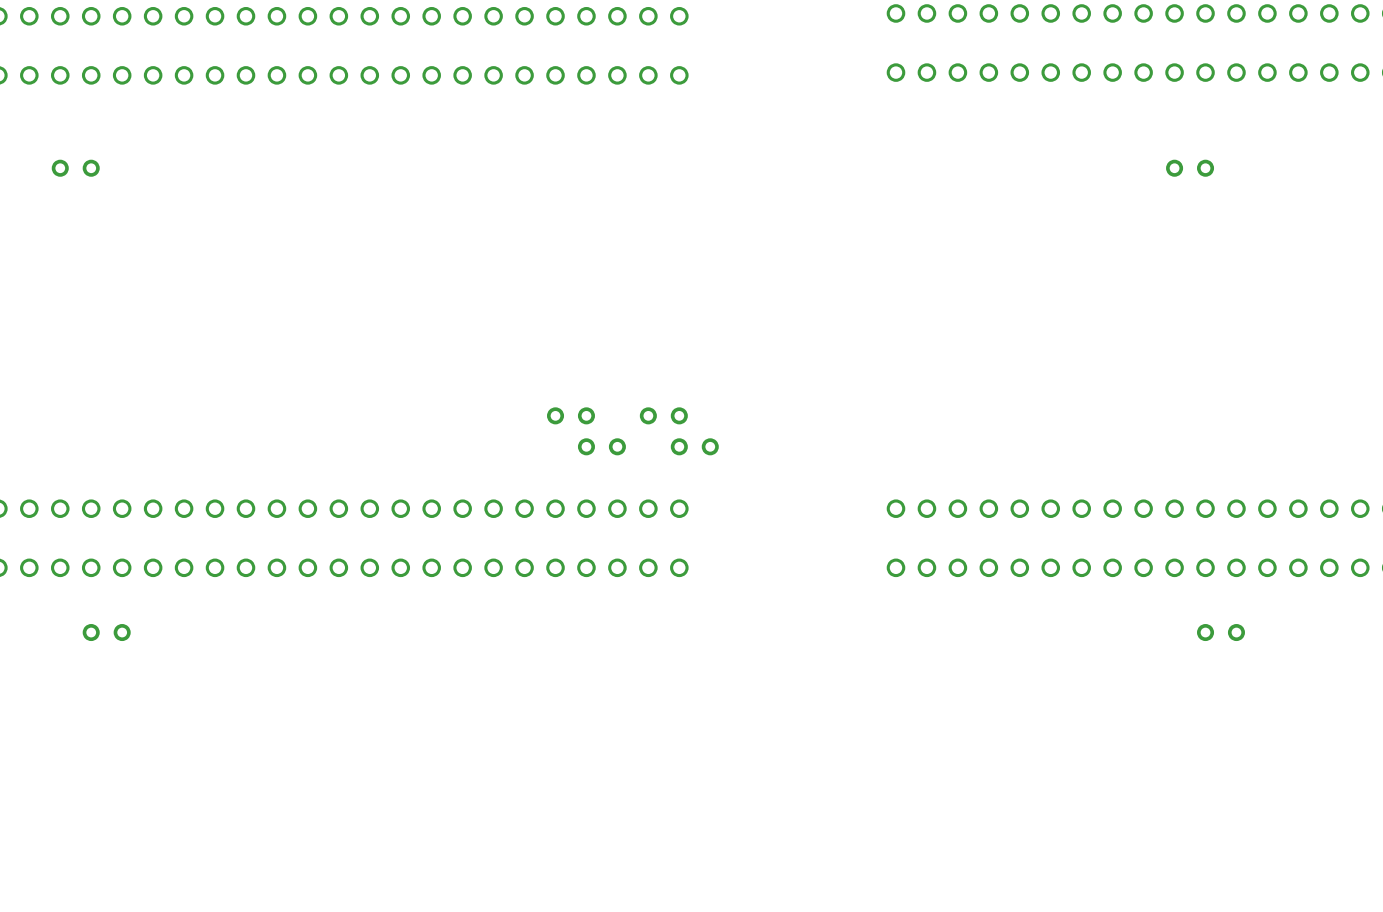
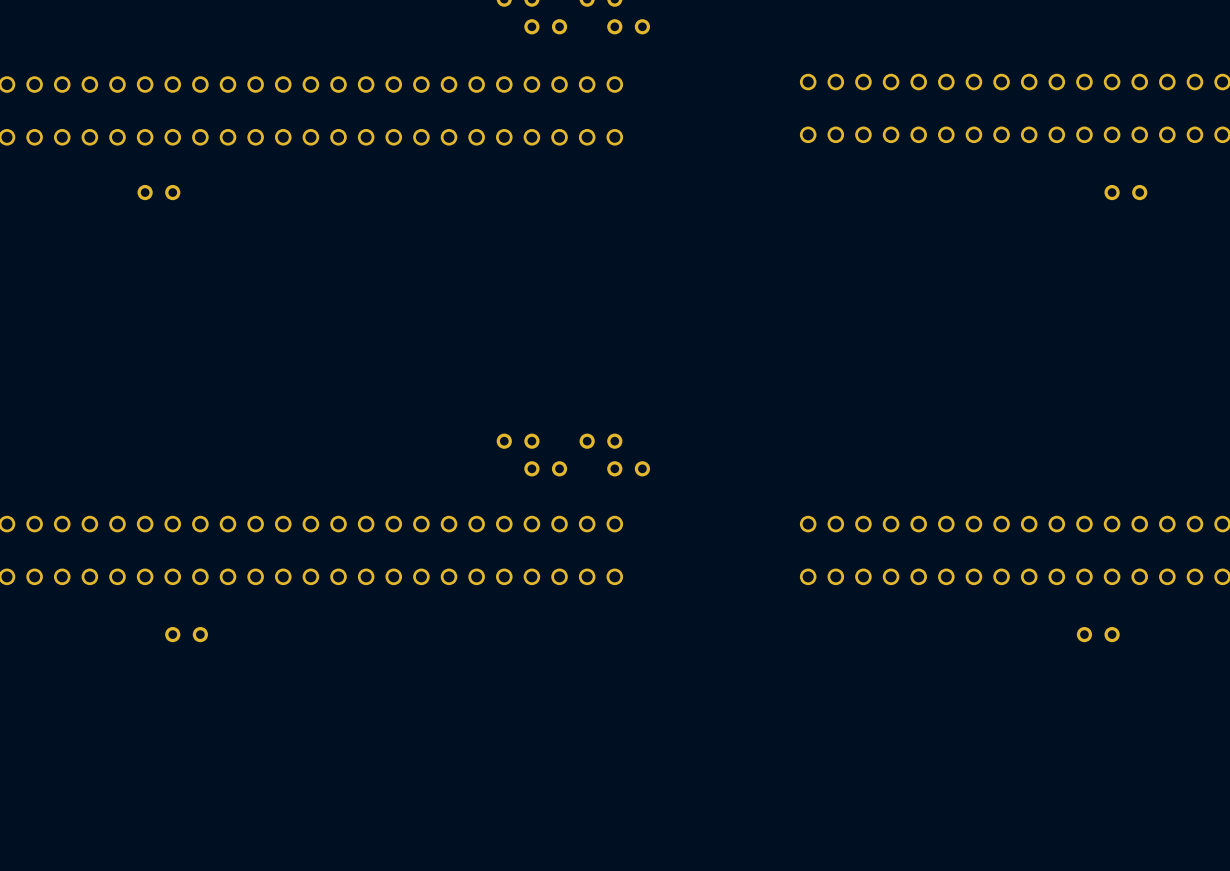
part position: (75, 168) -> (158, 192)
part position: (1190, 168) -> (1125, 192)
part position: (106, 632) -> (186, 634)

